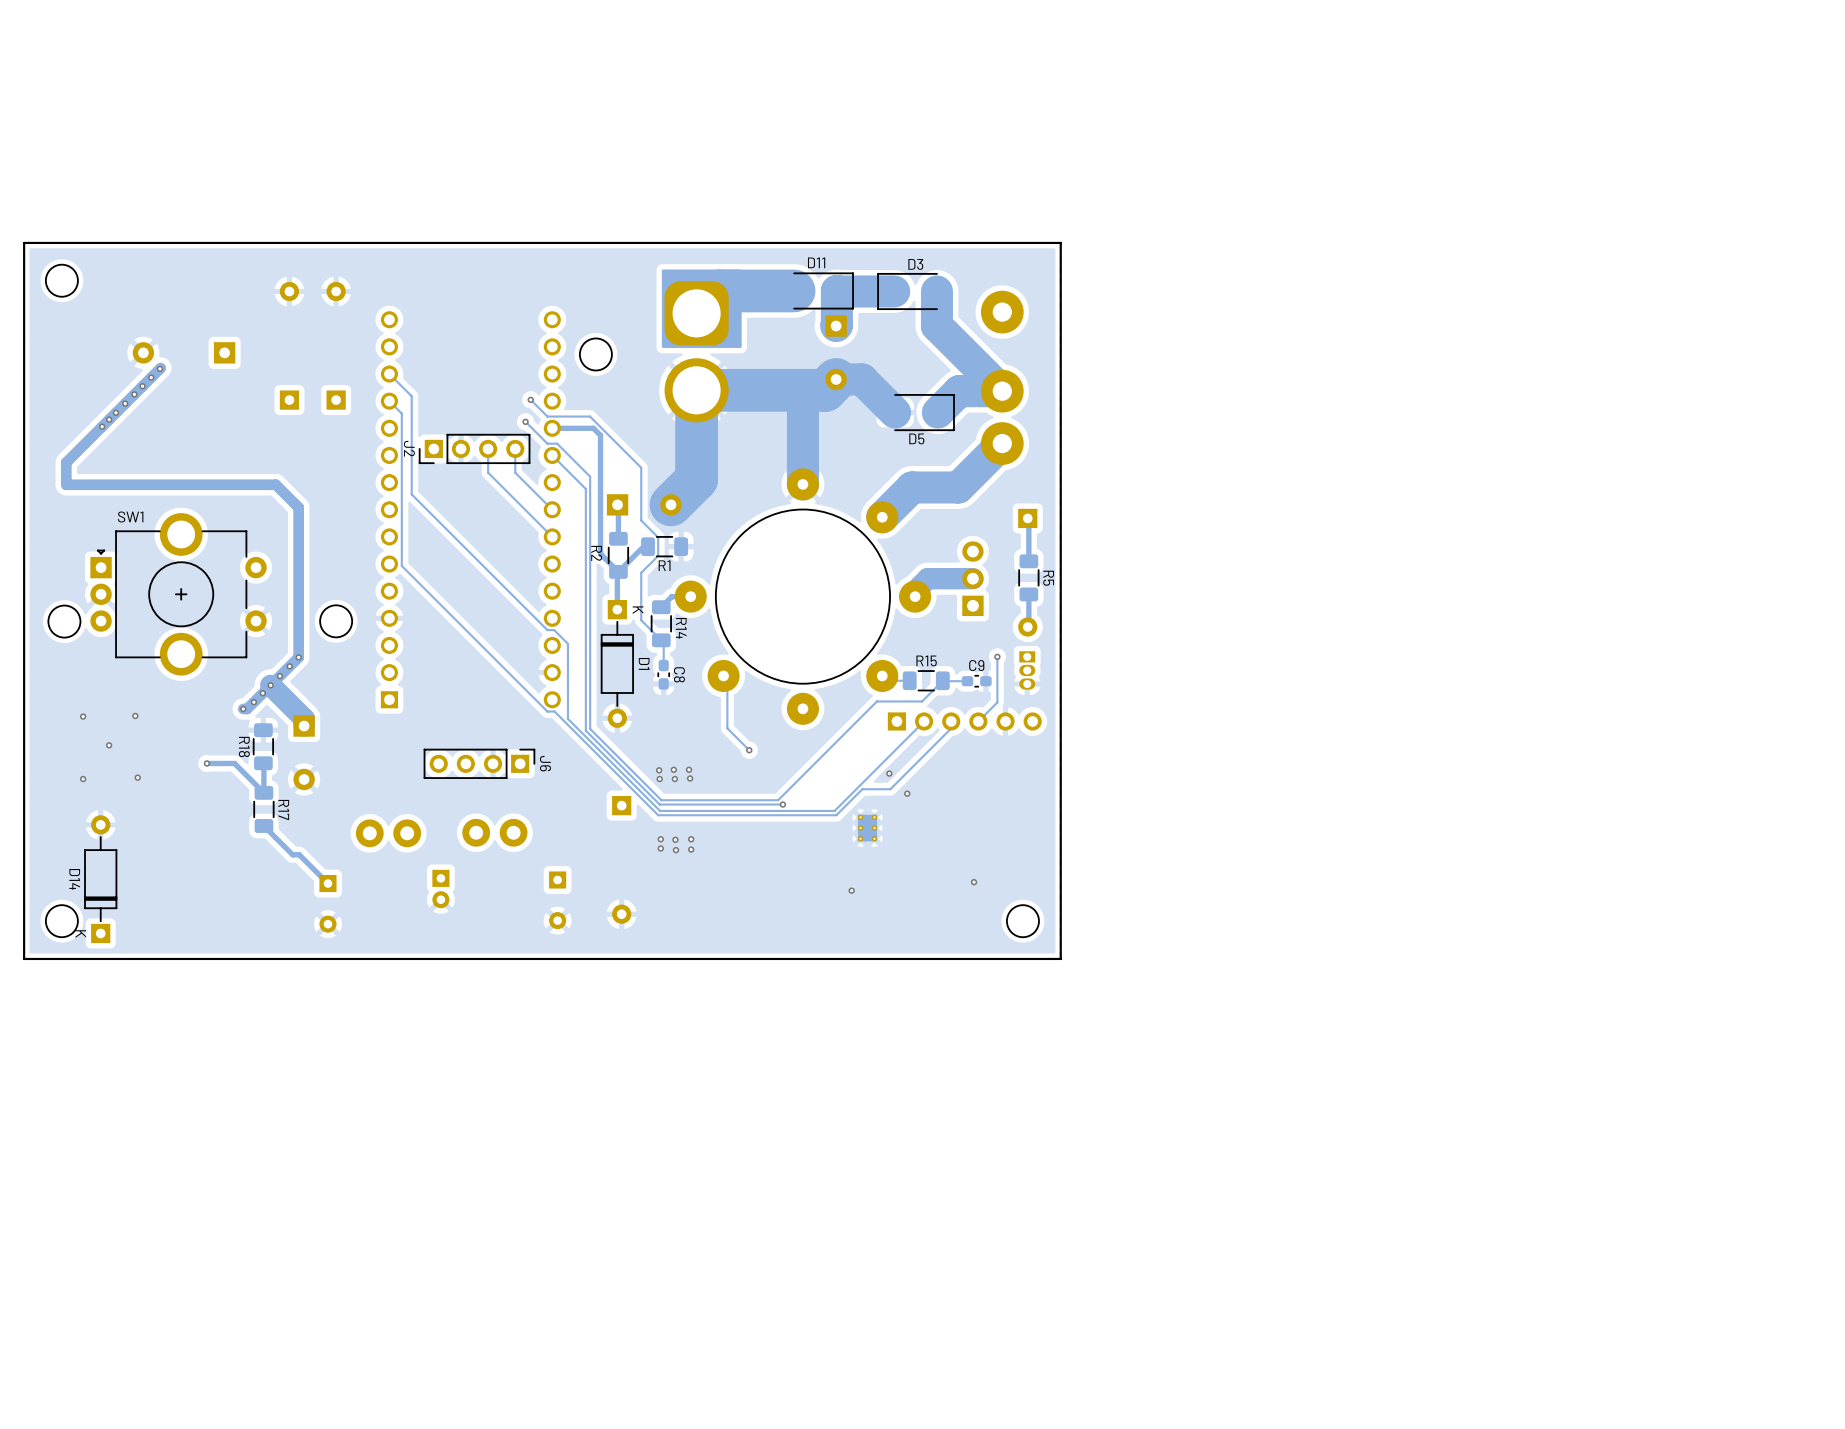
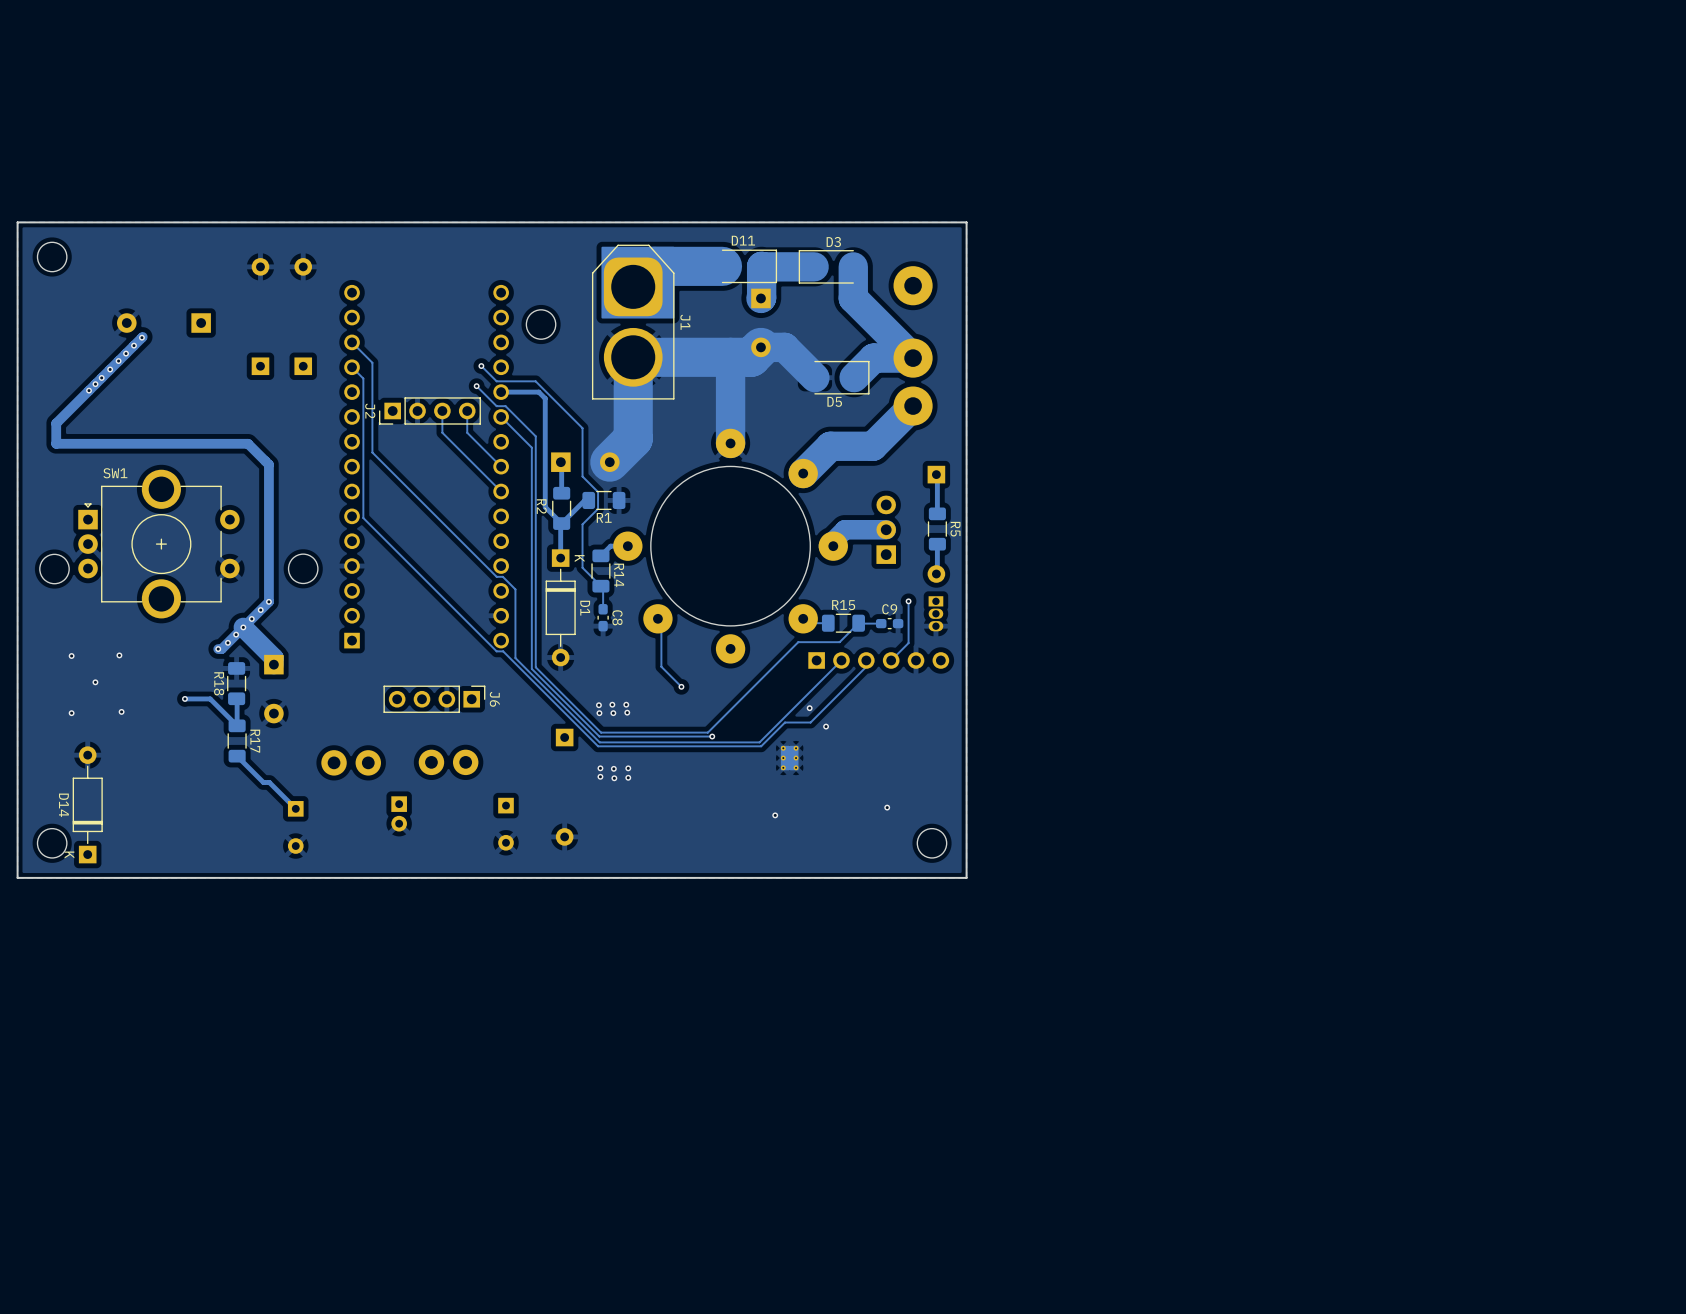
J1 side: top (696, 351) -> bottom (633, 322)

